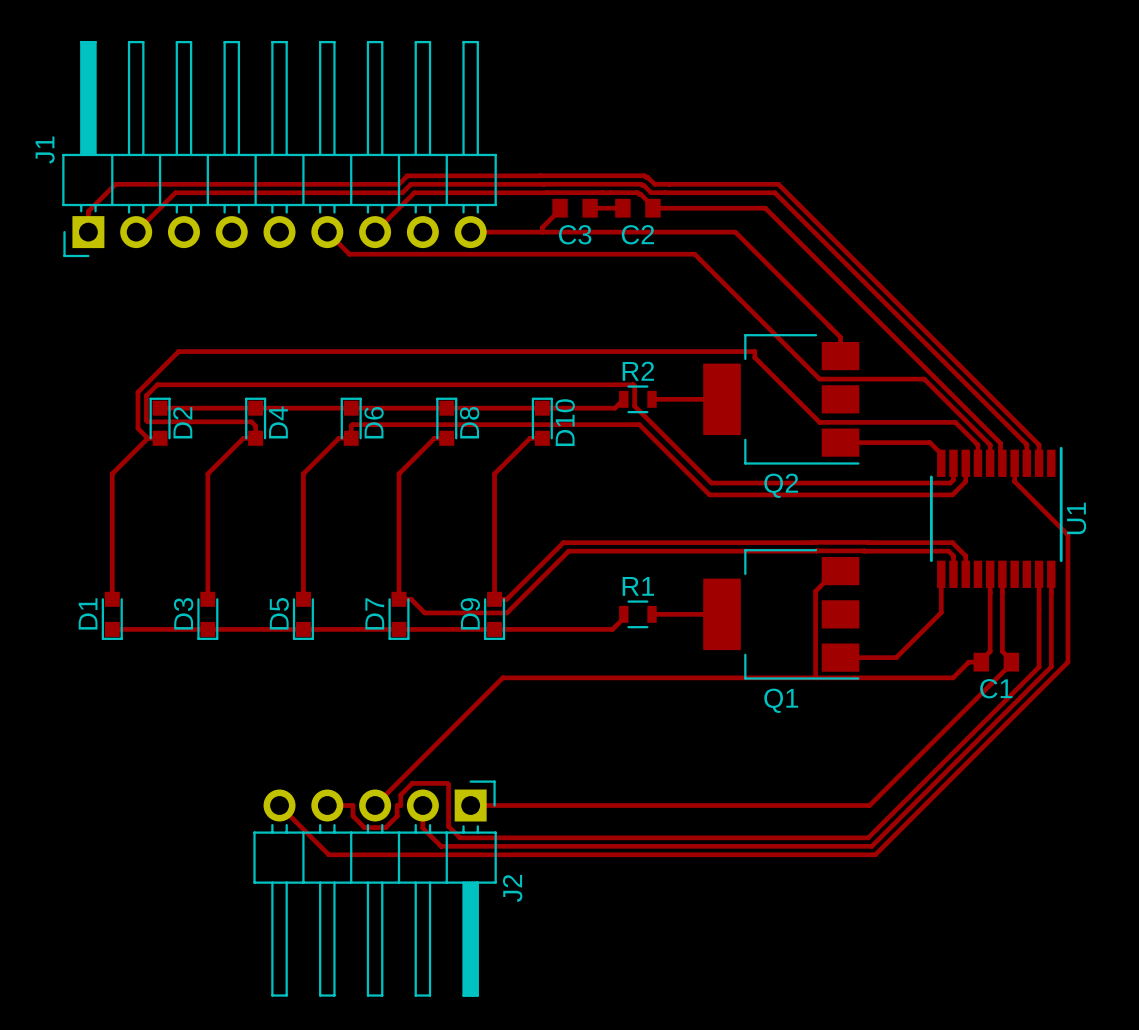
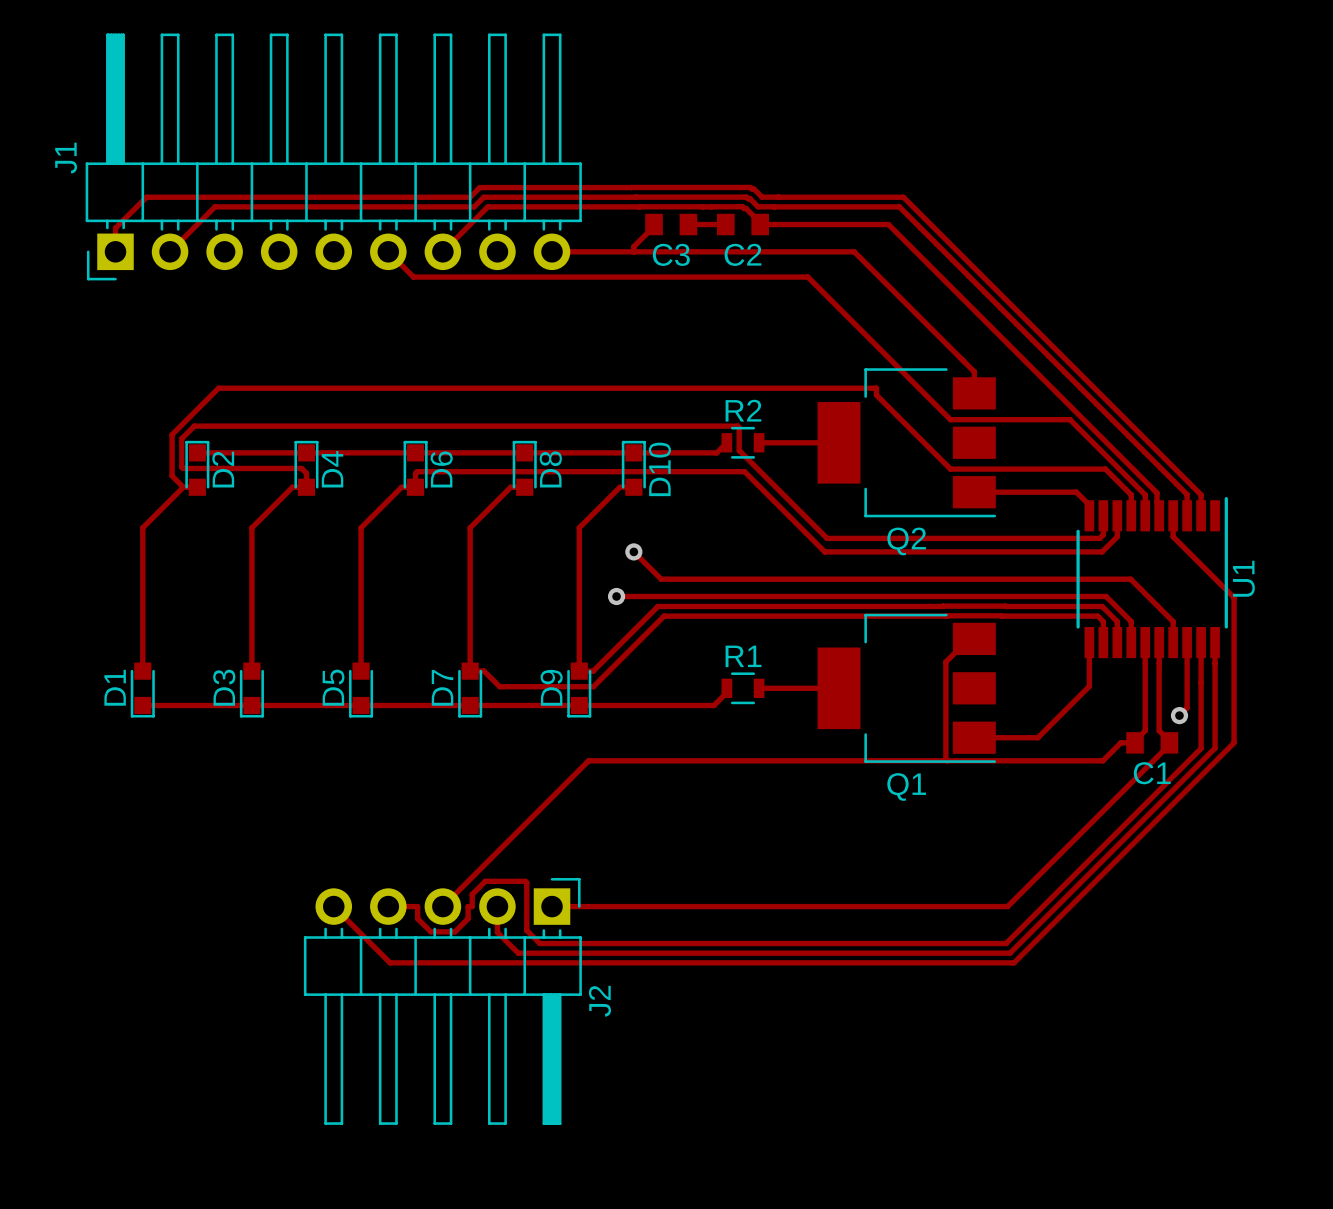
track: none -> (633, 551) (661, 579) (1130, 579) (1173, 621) (1173, 642)
via: none -> (633, 551)
track: none -> (616, 596) (1106, 596) (1131, 621) (1131, 642)
via: none -> (616, 596)
track: none -> (1187, 642) (1187, 707) (1179, 715)
via: none -> (1179, 715)

